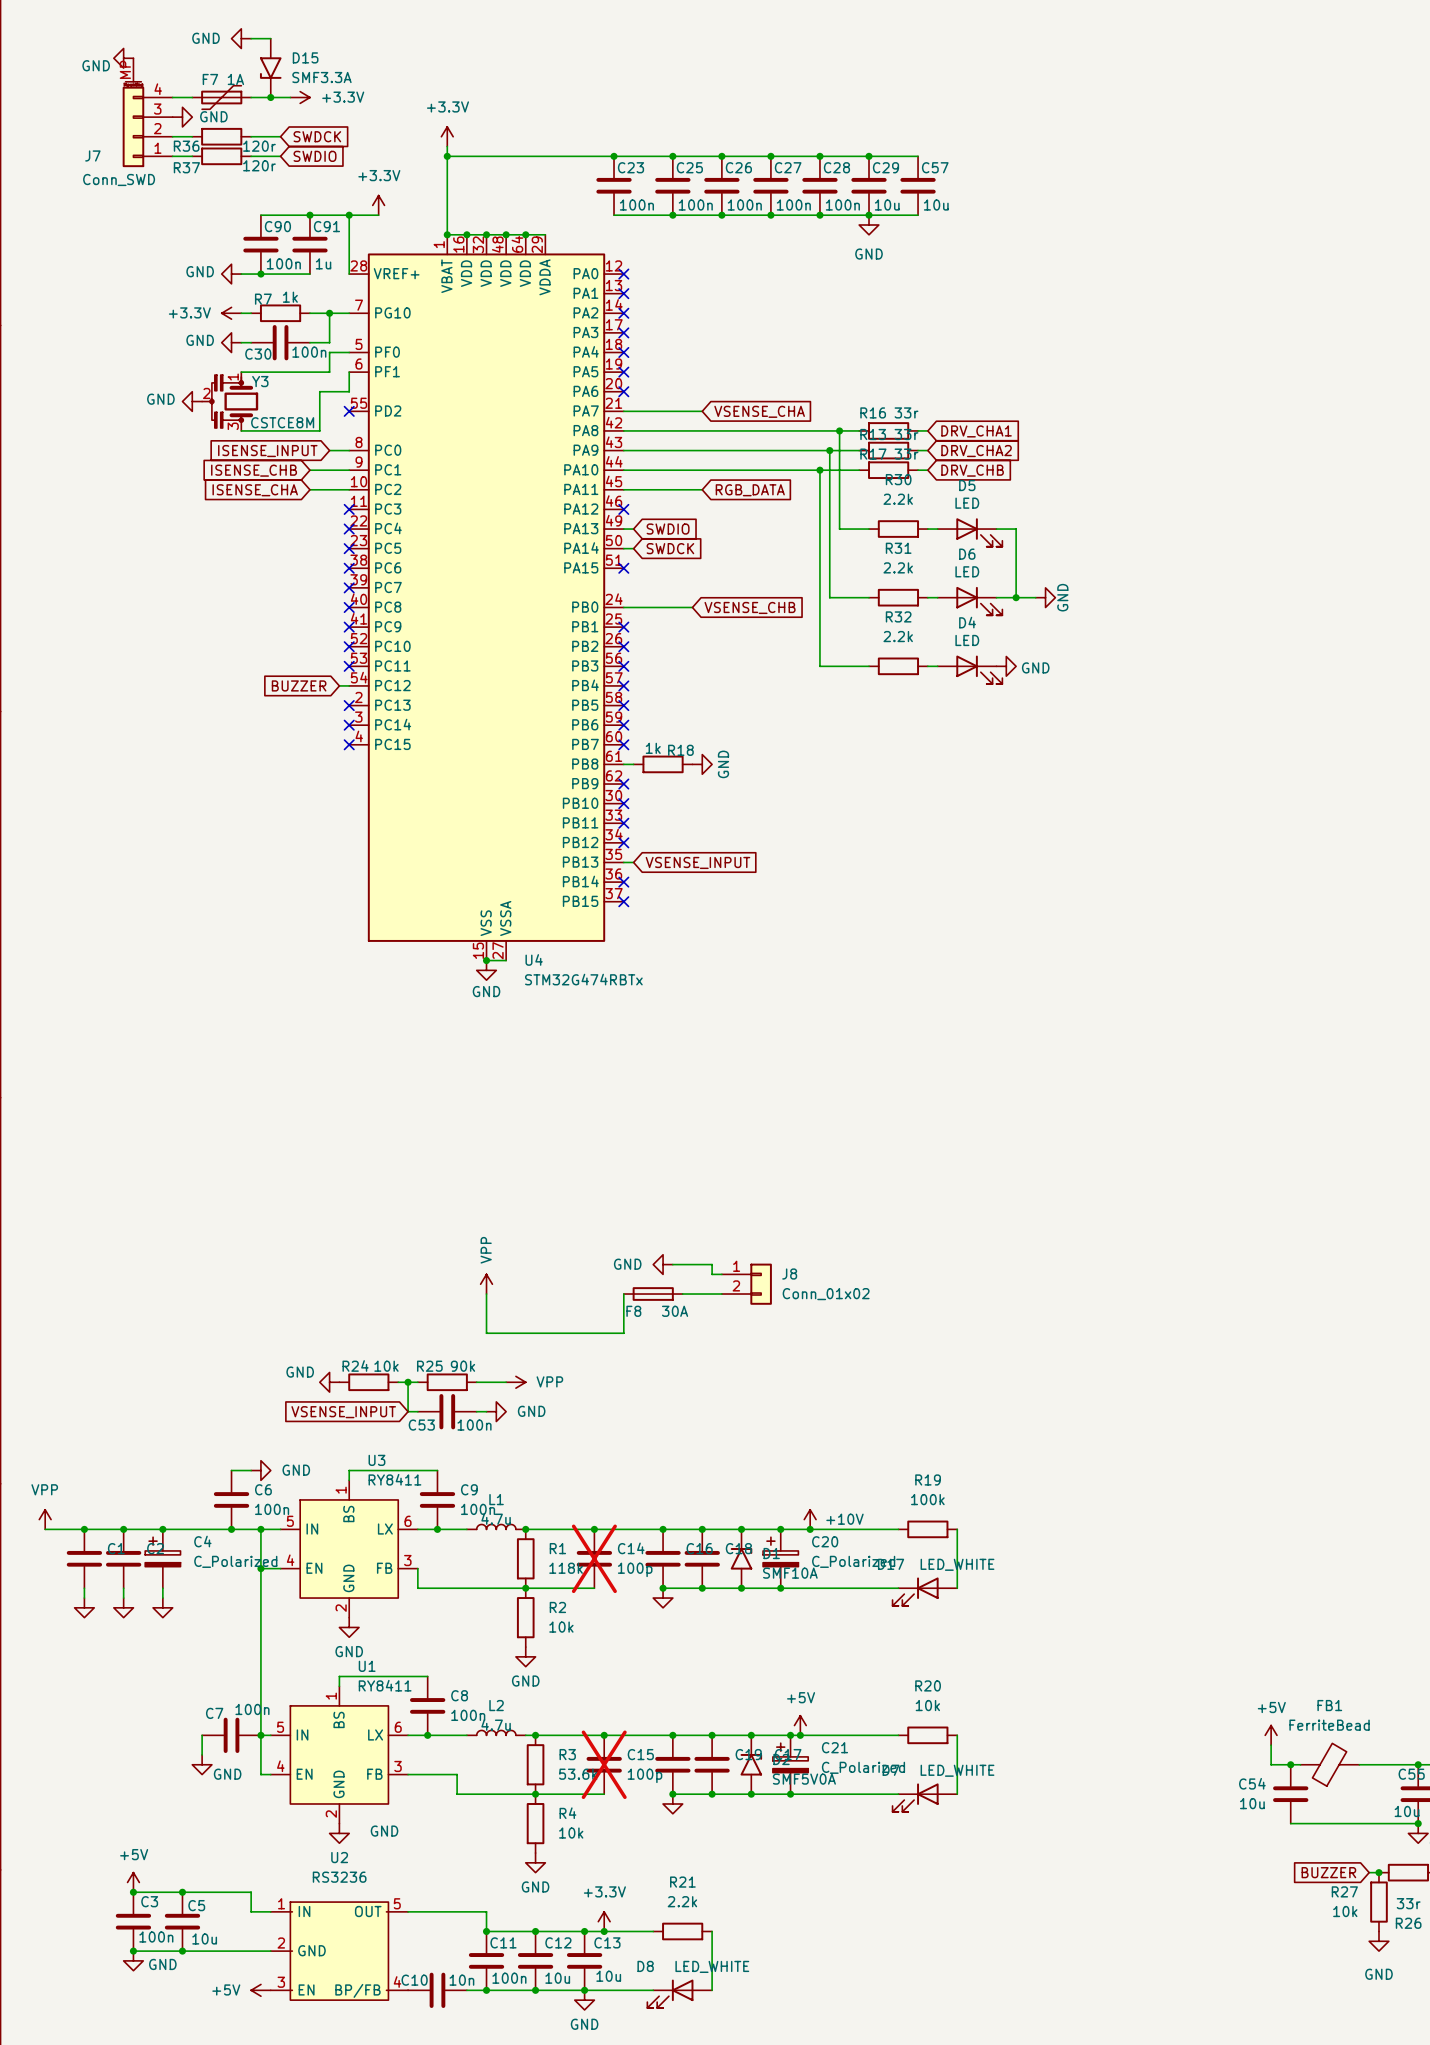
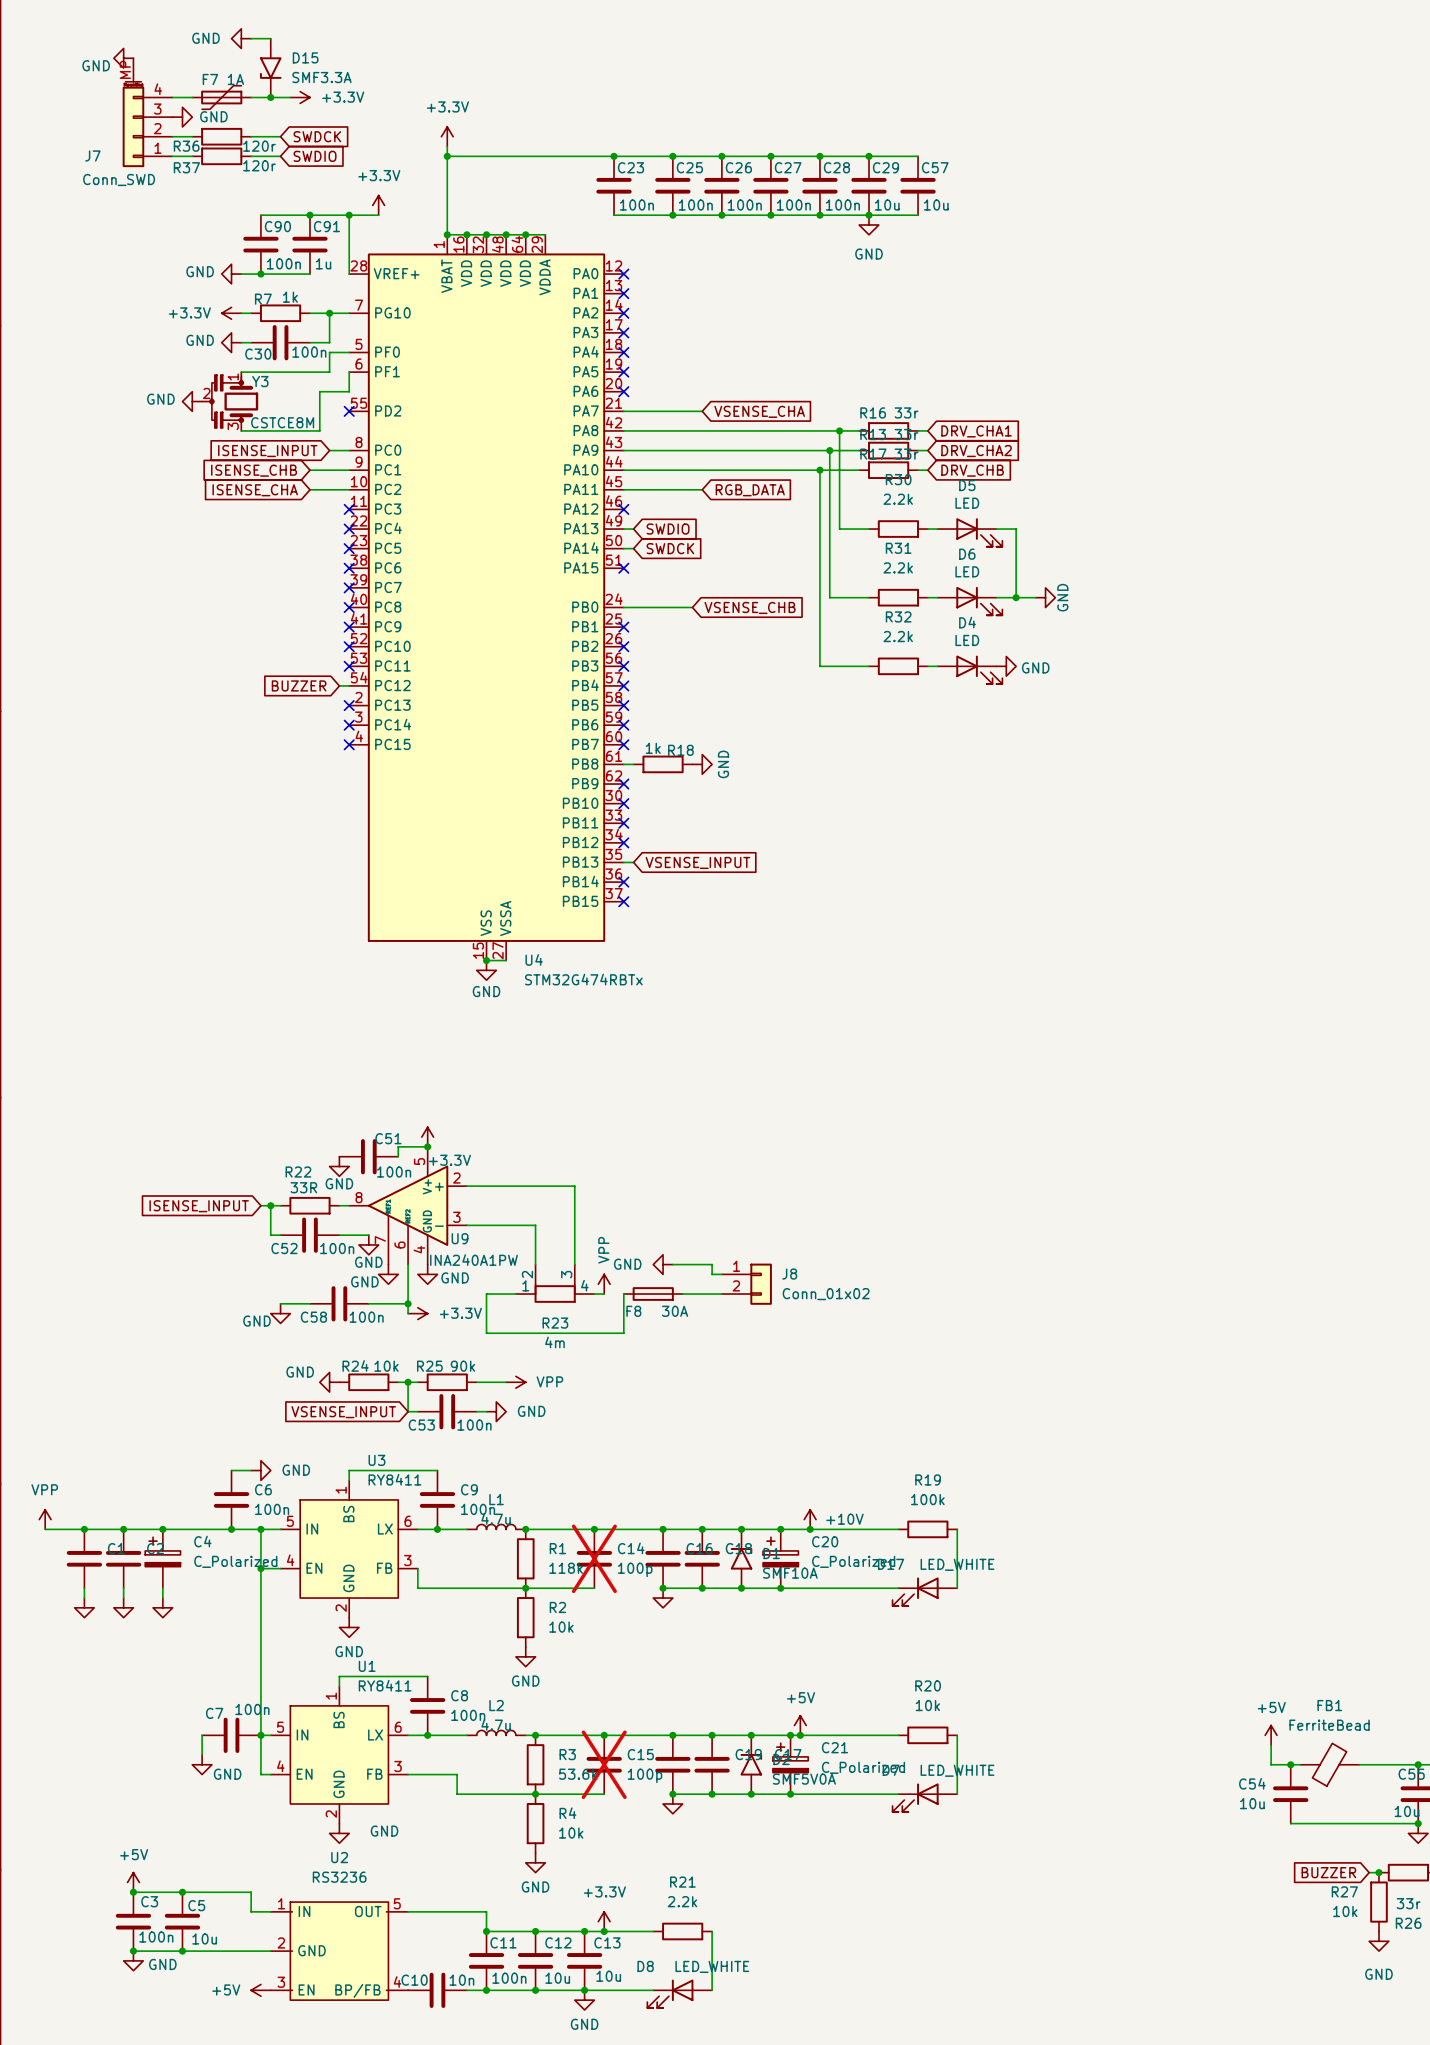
power symbol: none -> +3.3V (427, 1137)
wire: none -> (427, 1146) (398, 1146) (398, 1156)
junction: none -> (427, 1146)
C51: none -> 100n (368, 1156)
power symbol: none -> GND (339, 1166)
wire: none -> (466, 1186) (574, 1186) (574, 1264)
wire: none -> (260, 1205) (280, 1205)
wire: none -> (270, 1205) (270, 1235) (280, 1235)
junction: none -> (270, 1205)
R22: none -> 33R (309, 1205)
wire: none -> (339, 1205) (349, 1205)
U9: none -> INA240A1PW (408, 1205)
global label: none -> ISENSE_INPUT (199, 1206)
wire: none -> (466, 1225) (535, 1225) (535, 1264)
C52: none -> 100n (309, 1235)
wire: none -> (339, 1235) (368, 1235)
power symbol: none -> GND (368, 1244)
wire: none -> (408, 1264) (408, 1313)
power symbol: none -> GND (388, 1274)
power symbol: none -> GND (427, 1274)
R23: none -> 4m (555, 1283)
power symbol position: VPP (486, 1284) -> VPP (604, 1284)
wire: none -> (486, 1294) (515, 1294)
wire: none -> (594, 1294) (604, 1294)
wire: none -> (280, 1303) (309, 1303)
C58: none -> 100n (339, 1303)
wire: none -> (368, 1303) (408, 1303)
junction: none -> (408, 1303)
power symbol: none -> GND (280, 1313)
power symbol: none -> +3.3V (417, 1313)

